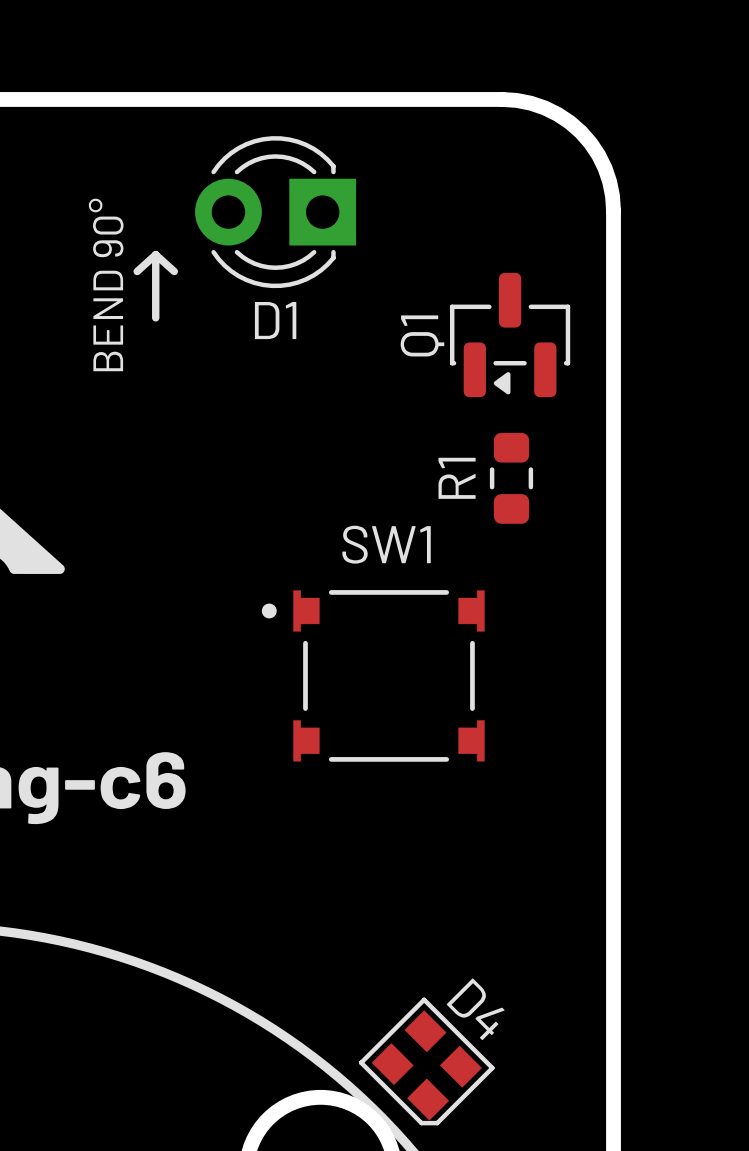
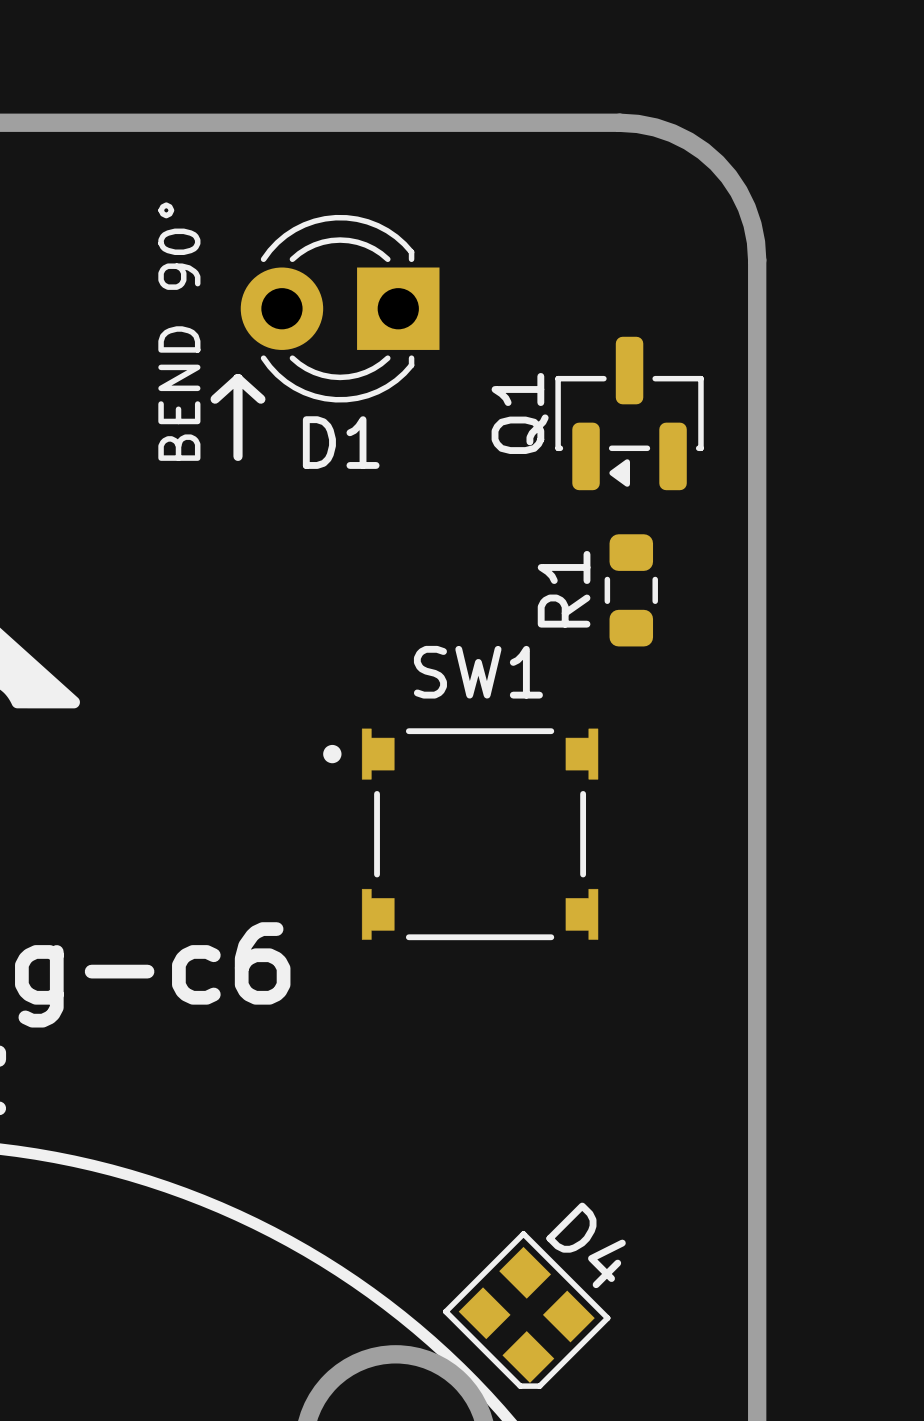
D1 footprint: [195, 136, 357, 289] -> [240, 214, 440, 403]
line: (155, 254) (137, 271) -> (238, 378) (215, 399)
line: (155, 254) (174, 271) -> (238, 378) (260, 399)
line: (155, 254) (155, 317) -> (238, 378) (238, 456)
text position: BEND 90° (106, 284) -> BEND 90° (179, 331)

